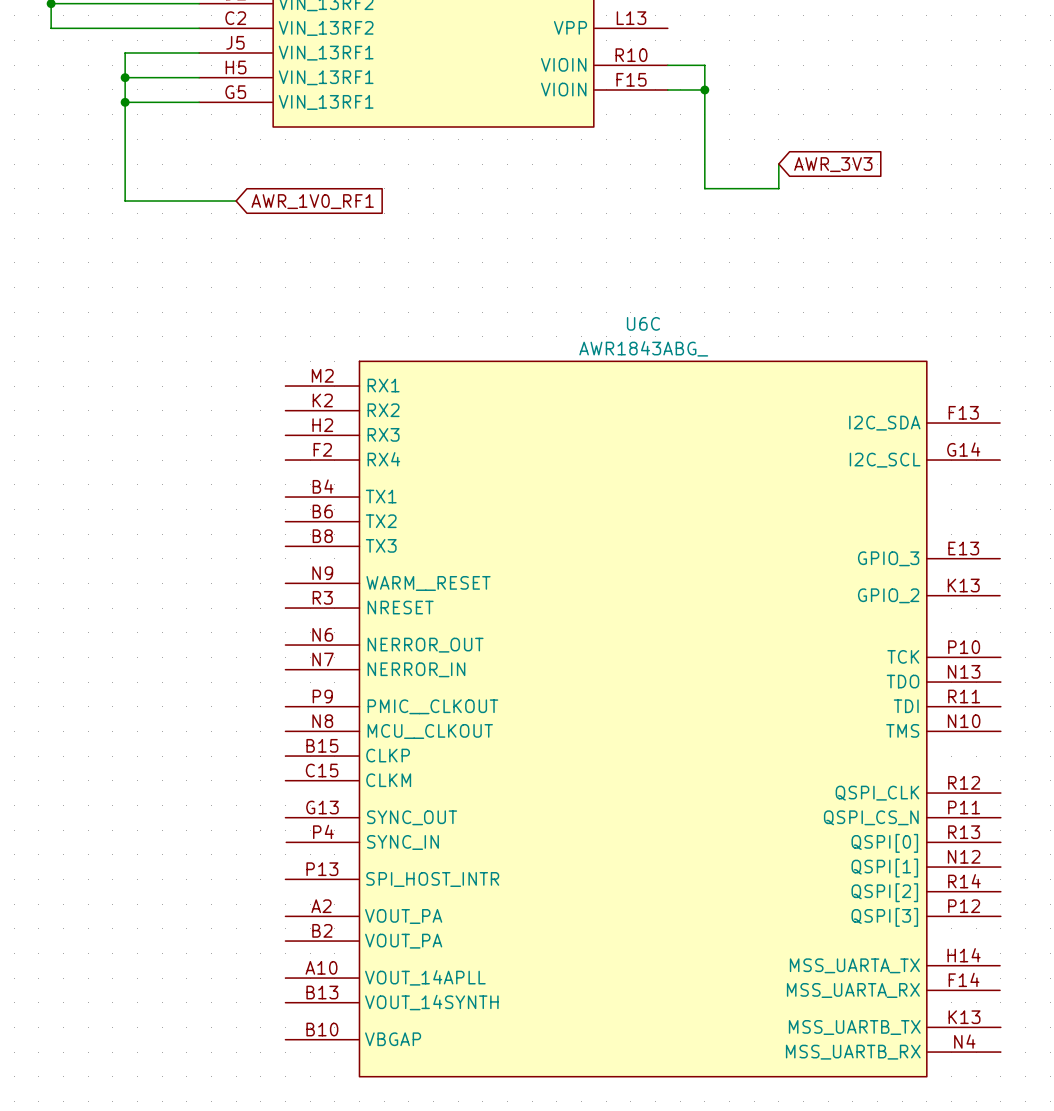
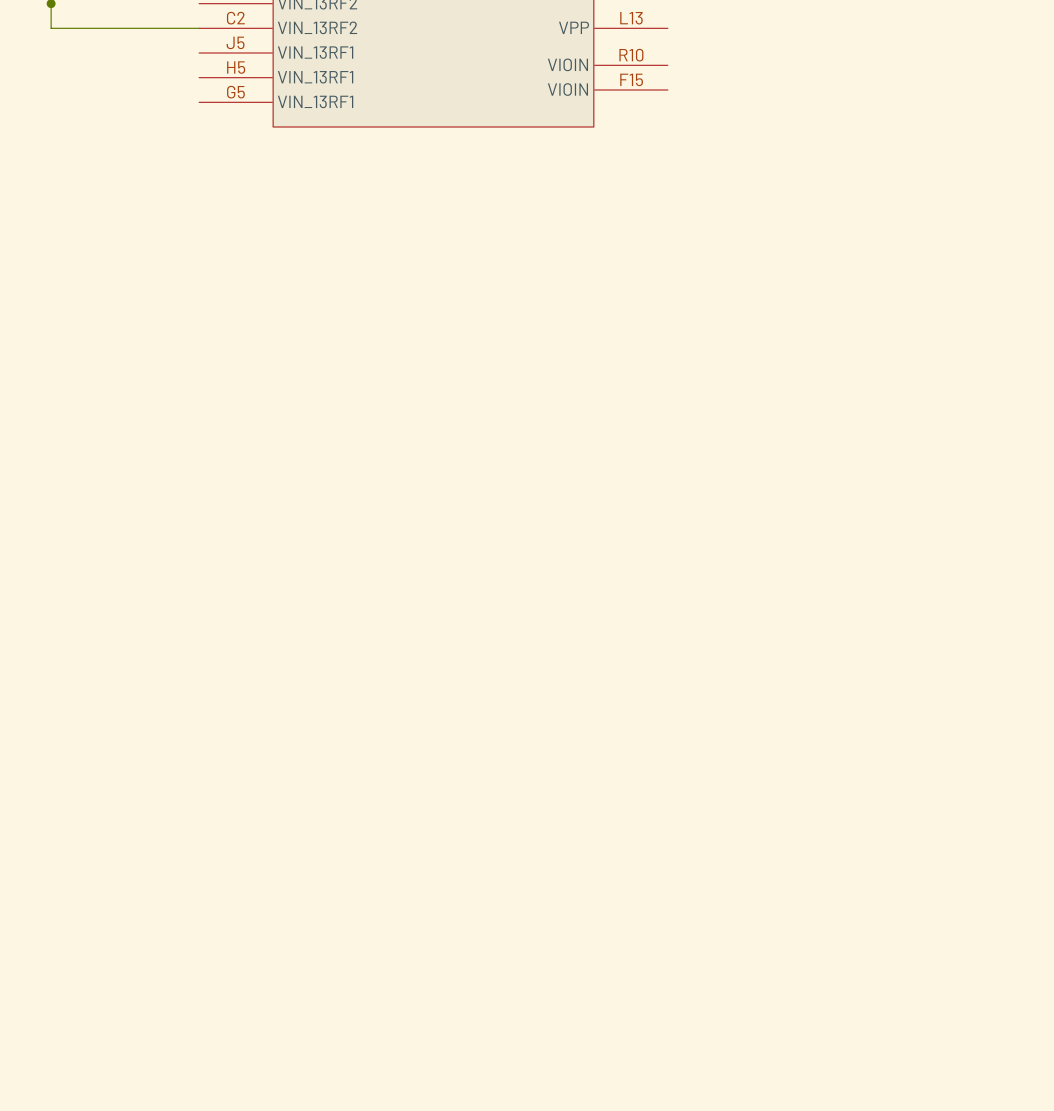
wire: (51, 3) (199, 3) -> none
wire: (199, 52) (125, 52) (125, 201) (236, 201) -> none
wire: (667, 65) (704, 65) (704, 188) (778, 188) (778, 164) -> none
wire: (125, 77) (199, 77) -> none
junction: (125, 77) -> none
wire: (667, 89) (704, 89) -> none
junction: (704, 89) -> none
wire: (125, 102) (199, 102) -> none
junction: (125, 102) -> none
global label: AWR_3V3 (833, 164) -> none
global label: AWR_1V0_RF1 (312, 201) -> none
U6C: AWR1843ABG_ (643, 719) -> none

